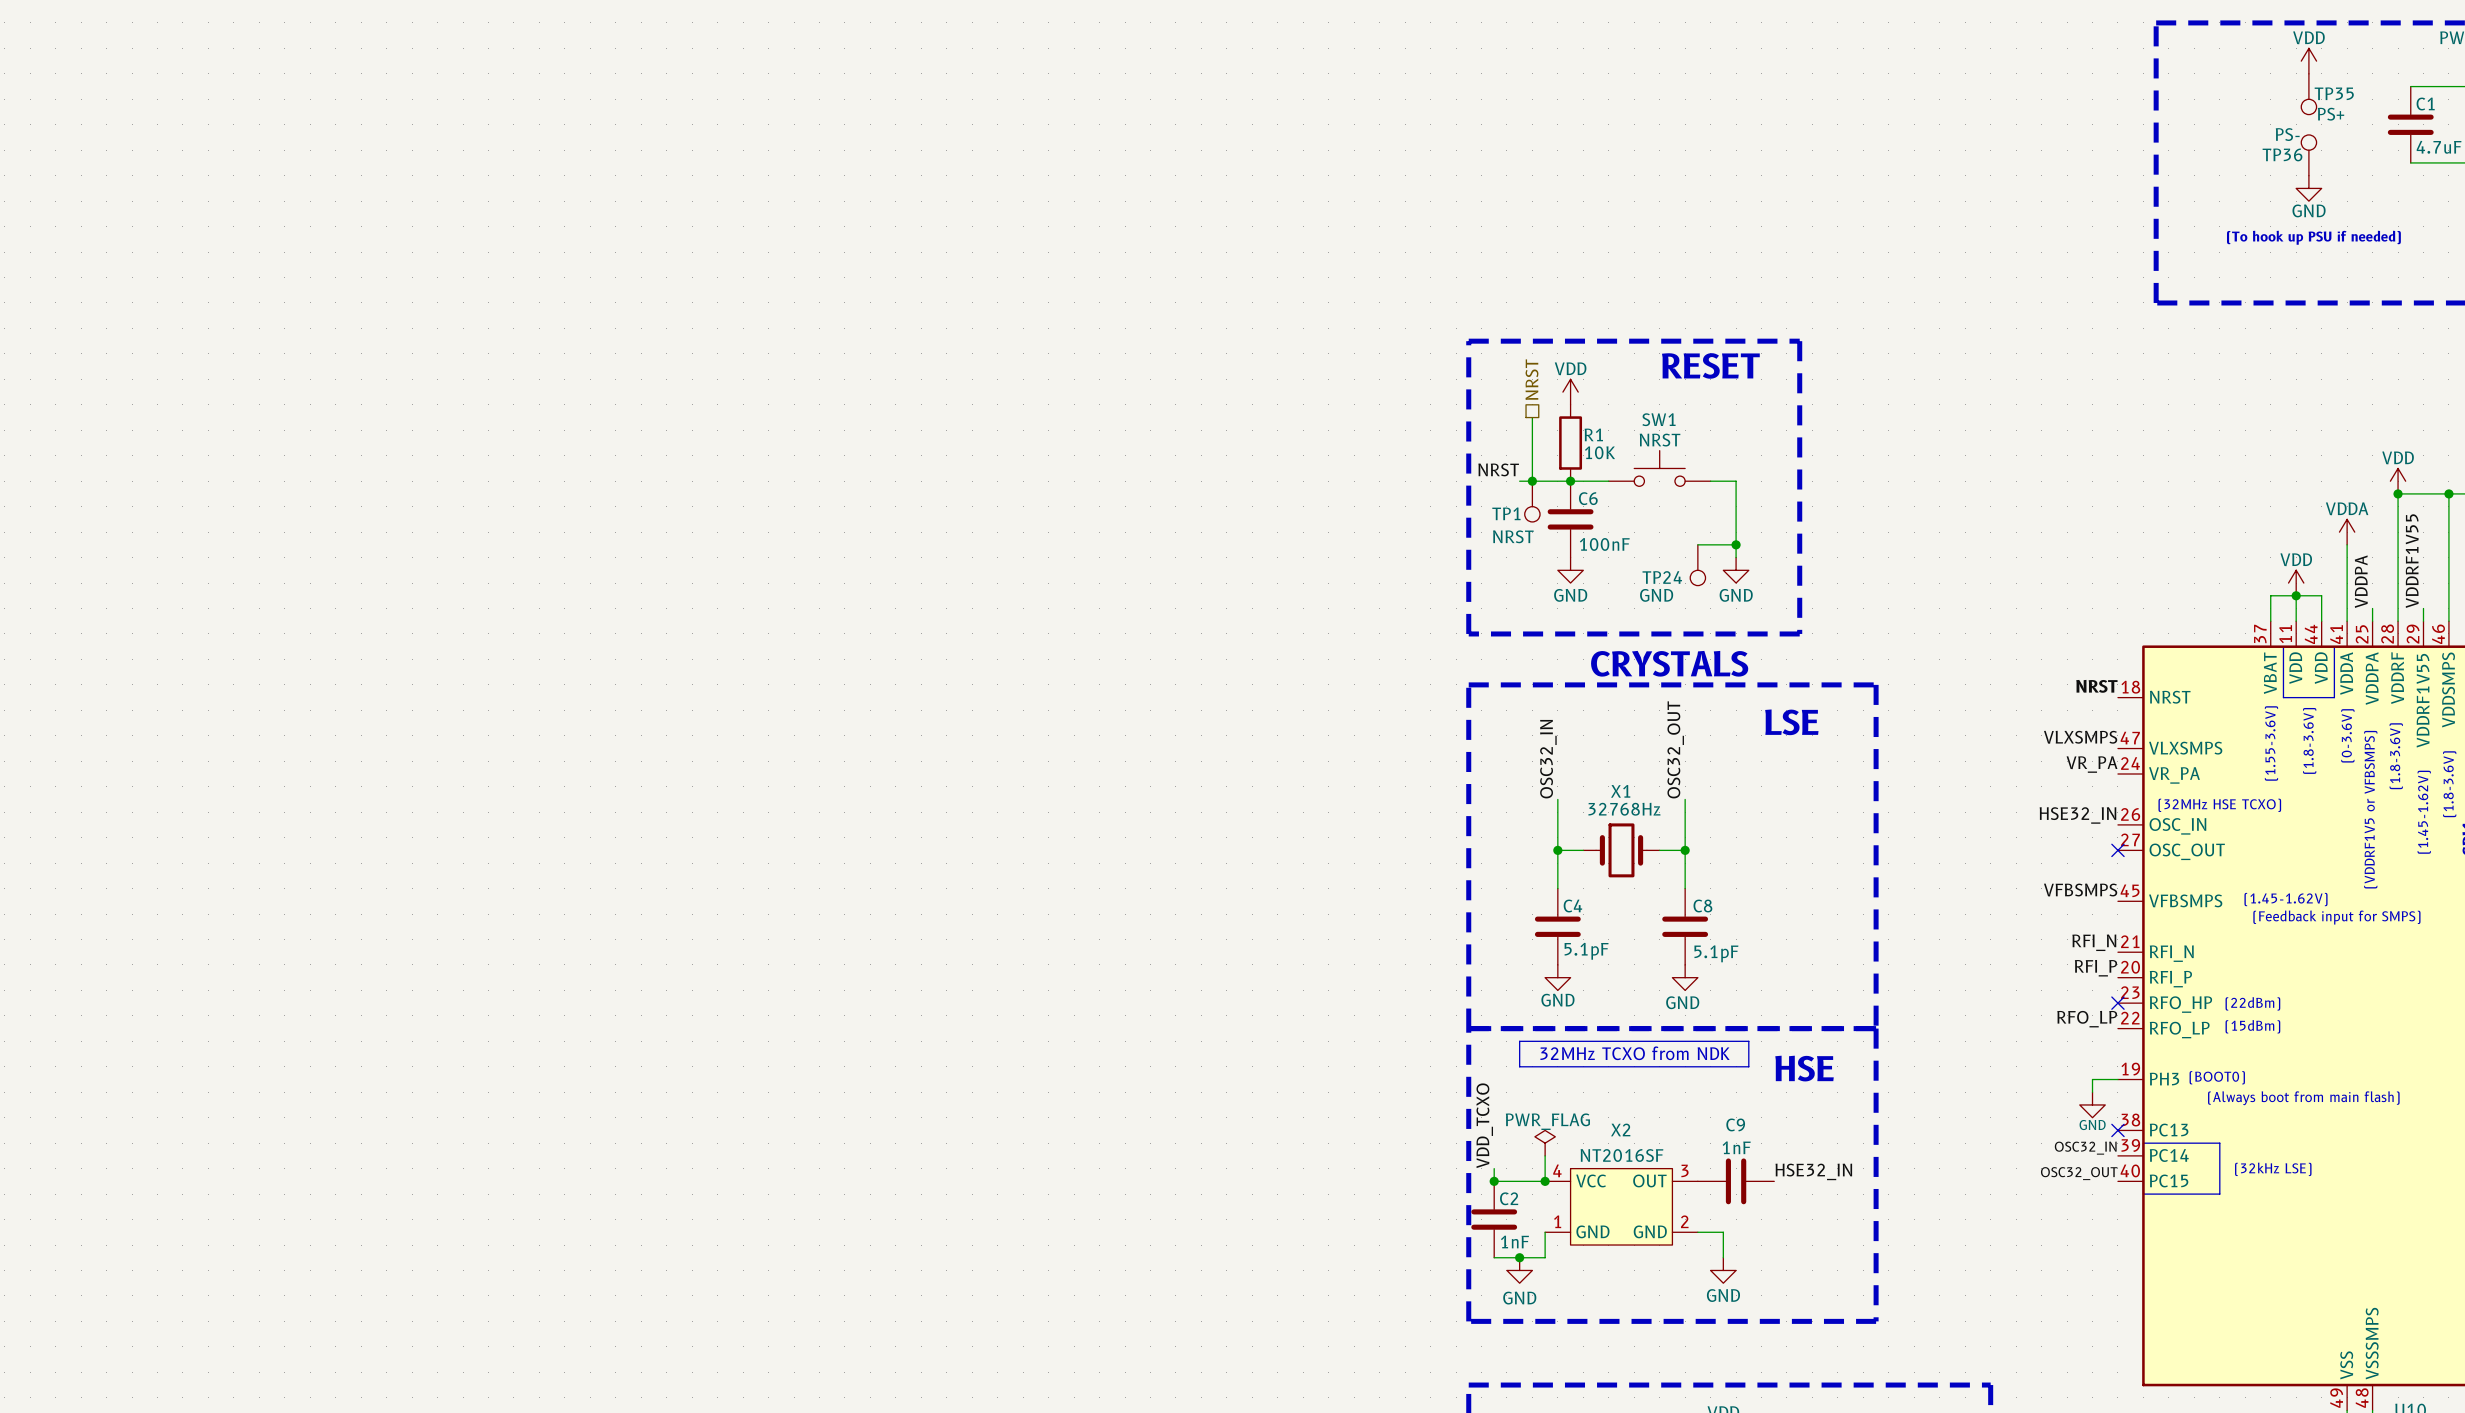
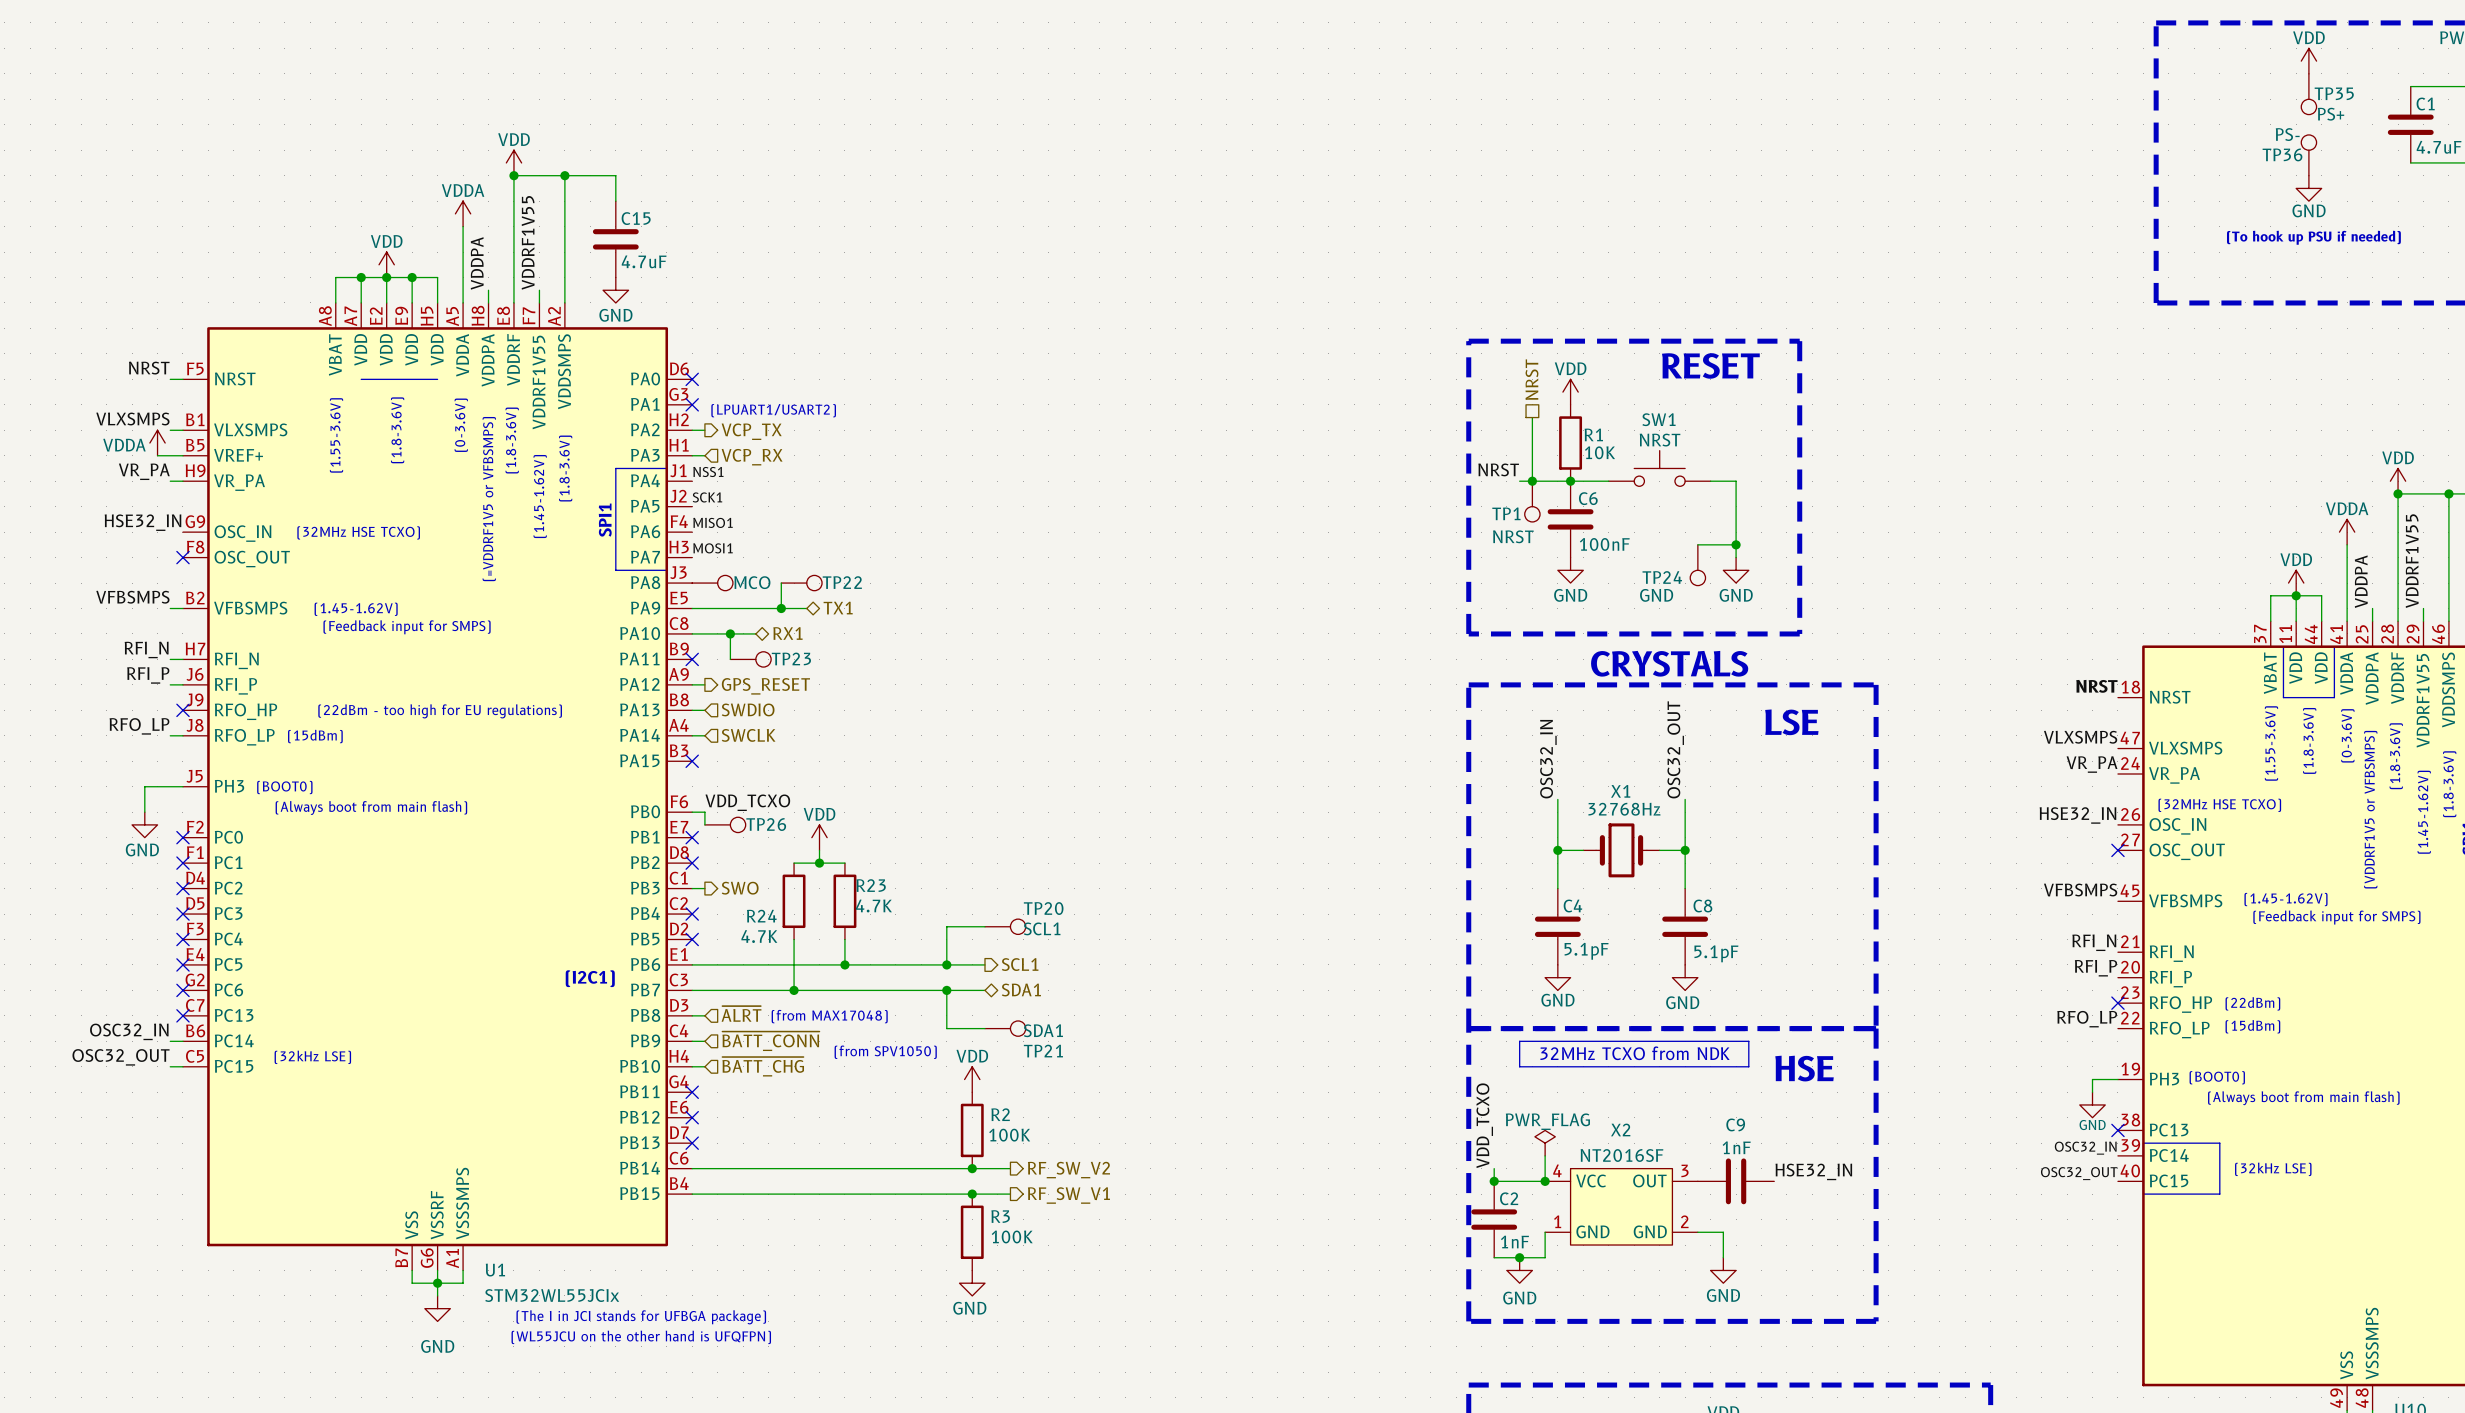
power symbol: none -> VDD (513, 162)
junction: none -> (513, 175)
wire: none -> (564, 175) (564, 302)
junction: none -> (564, 175)
wire: none -> (615, 201) (615, 175) (513, 175) (513, 302)
power symbol: none -> VDDA (463, 213)
wire: none -> (463, 226) (463, 302)
C15: none -> 4.7uF (615, 239)
label: none -> VDDRF1V55 (528, 242)
label: none -> VDDPA (477, 263)
power symbol: none -> VDD (386, 264)
wire: none -> (361, 277) (361, 302)
junction: none -> (361, 277)
wire: none -> (386, 277) (386, 302)
junction: none -> (386, 277)
wire: none -> (412, 277) (412, 302)
junction: none -> (412, 277)
wire: none -> (488, 290) (488, 302)
wire: none -> (539, 290) (539, 302)
power symbol: none -> GND (615, 290)
wire: none -> (335, 302) (335, 277) (437, 277) (437, 302)
label: none -> NRST (149, 368)
wire: none -> (170, 379) (182, 379)
line: none -> (361, 379) (437, 379)
no-connect mark: none -> (692, 379)
no-connect mark: none -> (692, 404)
text: none -> (LPUART1/USART2) (773, 410)
label: none -> VLXSMPS (132, 419)
text: none -> (0-3.6V) (461, 425)
wire: none -> (170, 430) (182, 430)
text: none -> (1.8-3.6V) (397, 430)
wire: none -> (692, 430) (704, 430)
hierarchical label: none -> VCP_TX (751, 431)
text: none -> (1.55-3.6V) (336, 435)
text: none -> (1.8-3.6V) (512, 440)
power symbol: none -> VDDA (157, 443)
wire: none -> (157, 455) (182, 455)
wire: none -> (692, 455) (704, 455)
hierarchical label: none -> VCP_RX (752, 457)
text: none -> (1.8-3.6V) (565, 468)
line: none -> (615, 468) (666, 468) (666, 570) (615, 570) (615, 468)
label: none -> VR_PA (144, 471)
label: none -> NSS1 (708, 471)
wire: none -> (170, 481) (182, 481)
text: none -> (1.45-1.62V) (540, 496)
label: none -> SCK1 (707, 497)
text: none -> (=VDDRF1V5 or VFBSMPS) (489, 499)
text: none -> SPI1 (605, 520)
label: none -> HSE32_IN (142, 522)
label: none -> MISO1 (713, 522)
text: none -> (32MHz HSE TCXO) (358, 532)
label: none -> MOSI1 (713, 548)
no-connect mark: none -> (182, 557)
part: none -> MCO (712, 583)
wire: none -> (781, 583) (781, 608)
TP22: none -> (801, 583)
label: none -> VFBSMPS (132, 597)
wire: none -> (170, 608) (182, 608)
wire: none -> (692, 608) (806, 608)
junction: none -> (781, 608)
hierarchical label: none -> TX1 (838, 608)
text: none -> (1.45-1.62V) (356, 609)
text: none -> (Feedback input for SMPS) (407, 627)
wire: none -> (692, 633) (755, 633)
wire: none -> (730, 633) (730, 659)
junction: none -> (730, 633)
hierarchical label: none -> RX1 (787, 633)
label: none -> RFI_N (146, 649)
wire: none -> (170, 659) (182, 659)
no-connect mark: none -> (692, 659)
TP23: none -> (750, 659)
label: none -> RFI_P (148, 675)
wire: none -> (170, 684) (182, 684)
wire: none -> (692, 684) (704, 684)
hierarchical label: none -> GPS_RESET (765, 686)
hierarchical label: none -> SWDIO (748, 709)
no-connect mark: none -> (182, 710)
wire: none -> (692, 710) (704, 710)
text: none -> (22dBm - too high for EU regulations) (440, 711)
label: none -> RFO_LP (139, 726)
wire: none -> (170, 735) (182, 735)
wire: none -> (692, 735) (704, 735)
hierarchical label: none -> SWCLK (748, 735)
text: none -> (15dBm) (315, 736)
no-connect mark: none -> (692, 761)
wire: none -> (182, 786) (144, 786) (144, 812)
U1: none -> STM32WL55JCIx (437, 786)
text: none -> (BOOT0) (284, 787)
label: none -> VDD_TCXO (747, 802)
text: none -> (Always boot from main flash) (371, 808)
wire: none -> (692, 812) (704, 812) (704, 824)
power symbol: none -> GND (144, 824)
TP26: none -> (725, 824)
no-connect mark: none -> (182, 837)
no-connect mark: none -> (692, 837)
power symbol: none -> VDD (819, 837)
wire: none -> (819, 850) (819, 863)
no-connect mark: none -> (182, 863)
no-connect mark: none -> (692, 863)
wire: none -> (794, 863) (844, 863)
junction: none -> (819, 863)
no-connect mark: none -> (182, 888)
wire: none -> (692, 888) (704, 888)
hierarchical label: none -> SWO (740, 888)
R24: none -> 4.7K (794, 901)
R23: none -> 4.7K (844, 901)
no-connect mark: none -> (182, 914)
no-connect mark: none -> (692, 914)
wire: none -> (984, 926) (946, 926) (946, 964)
TP20: none -> SCL1 (1005, 926)
no-connect mark: none -> (182, 939)
no-connect mark: none -> (692, 939)
wire: none -> (794, 939) (794, 990)
wire: none -> (844, 939) (844, 964)
no-connect mark: none -> (182, 964)
wire: none -> (692, 964) (984, 964)
junction: none -> (844, 964)
junction: none -> (946, 964)
hierarchical label: none -> SCL1 (1020, 964)
text: none -> (I2C1) (590, 978)
no-connect mark: none -> (182, 990)
wire: none -> (692, 990) (984, 990)
junction: none -> (794, 990)
wire: none -> (946, 990) (946, 1028) (984, 1028)
junction: none -> (946, 990)
hierarchical label: none -> SDA1 (1021, 990)
hierarchical label: none -> ~{ALRT} (741, 1013)
no-connect mark: none -> (182, 1015)
wire: none -> (692, 1015) (704, 1015)
text: none -> (from MAX17048) (829, 1016)
TP21: none -> SDA1 (1005, 1028)
label: none -> OSC32_IN (129, 1031)
wire: none -> (170, 1041) (182, 1041)
wire: none -> (692, 1041) (704, 1041)
hierarchical label: none -> ~{BATT_CONN} (770, 1041)
text: none -> (from SPV1050) (885, 1052)
label: none -> OSC32_OUT (121, 1057)
text: none -> (32kHz LSE) (312, 1057)
wire: none -> (170, 1066) (182, 1066)
wire: none -> (692, 1066) (704, 1066)
hierarchical label: none -> ~{BATT_CHG} (763, 1066)
power symbol: none -> VDD (972, 1079)
no-connect mark: none -> (692, 1092)
no-connect mark: none -> (692, 1117)
R2: none -> 100K (972, 1130)
no-connect mark: none -> (692, 1143)
wire: none -> (692, 1168) (1010, 1168)
junction: none -> (972, 1168)
hierarchical label: none -> RF_SW_V2 (1068, 1170)
wire: none -> (692, 1194) (1010, 1194)
junction: none -> (972, 1194)
hierarchical label: none -> RF_SW_V1 (1068, 1195)
R3: none -> 100K (972, 1232)
wire: none -> (412, 1270) (412, 1283) (463, 1283) (463, 1270)
wire: none -> (437, 1270) (437, 1295)
junction: none -> (437, 1283)
power symbol: none -> GND (972, 1283)
power symbol: none -> GND (437, 1308)
text: none -> (The I in JCI stands for UFBGA package) (641, 1317)
text: none -> (WL55JCU on the other hand is UFQFPN) (641, 1337)

